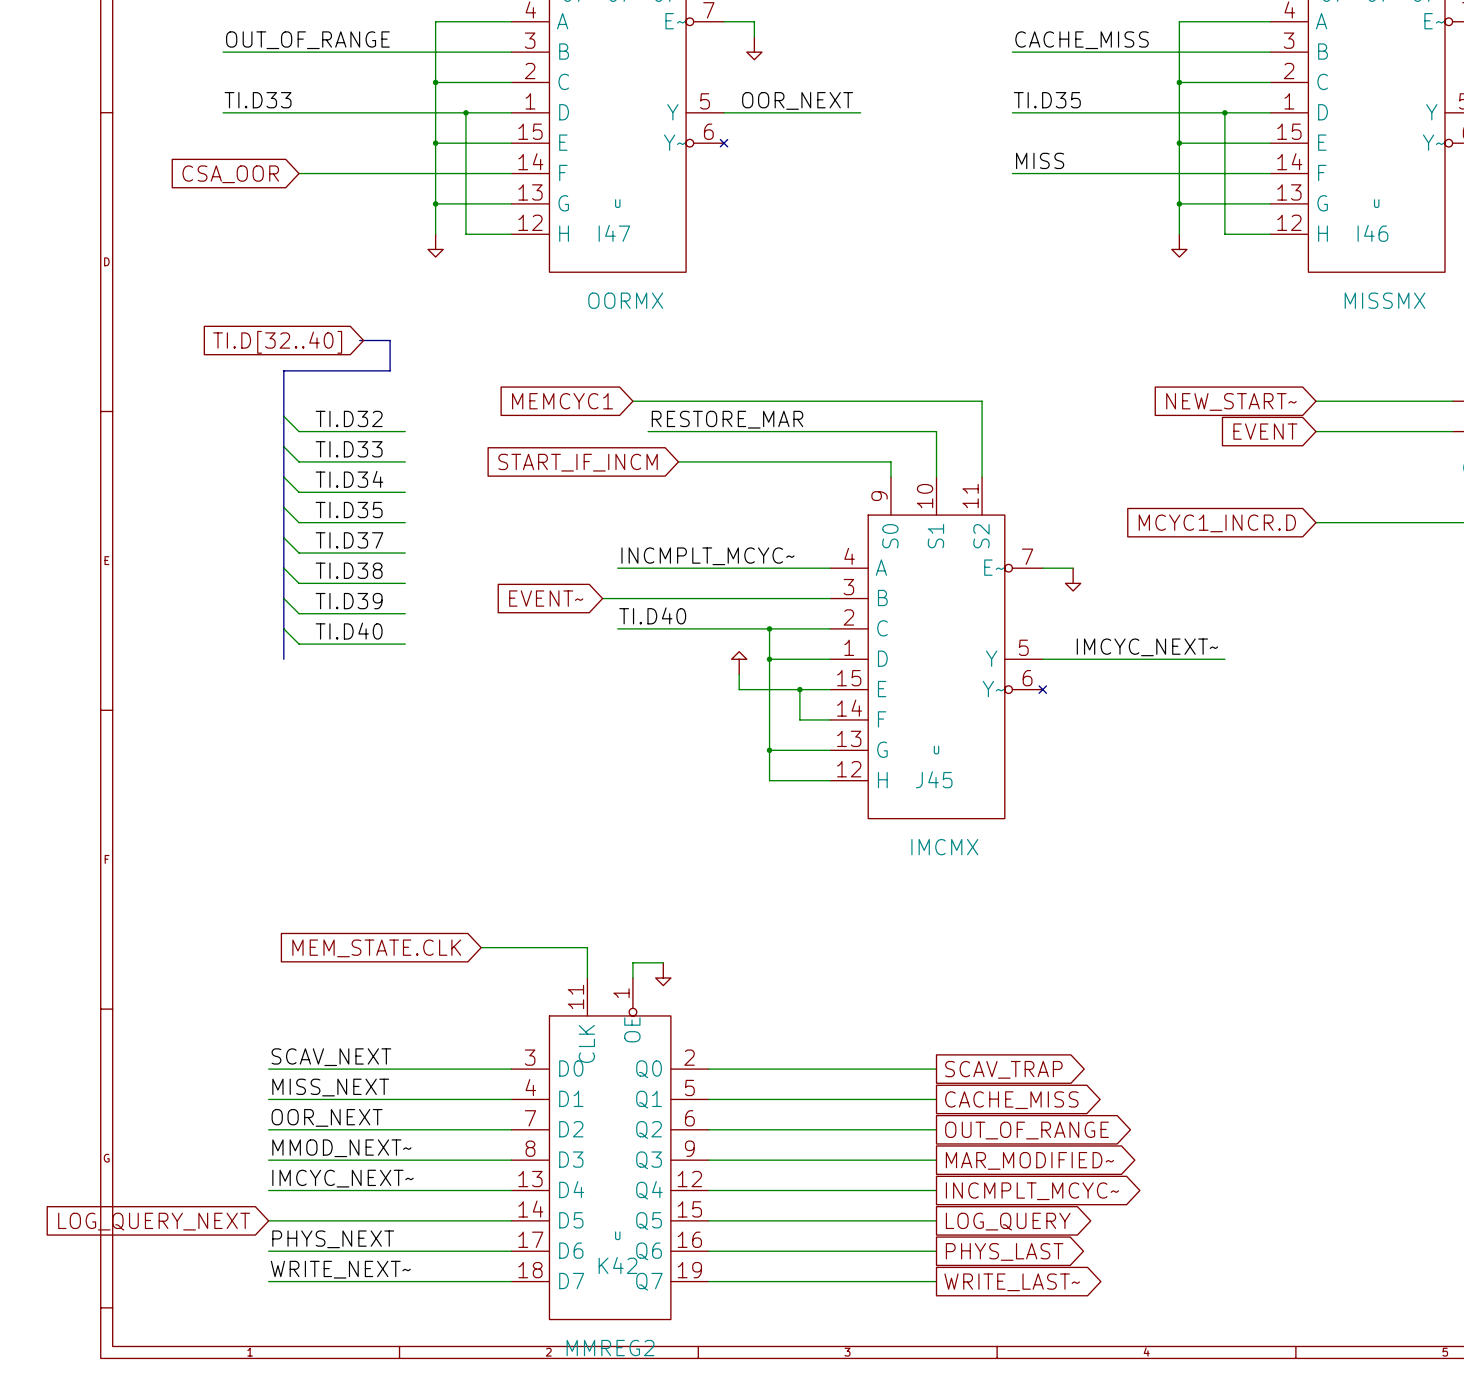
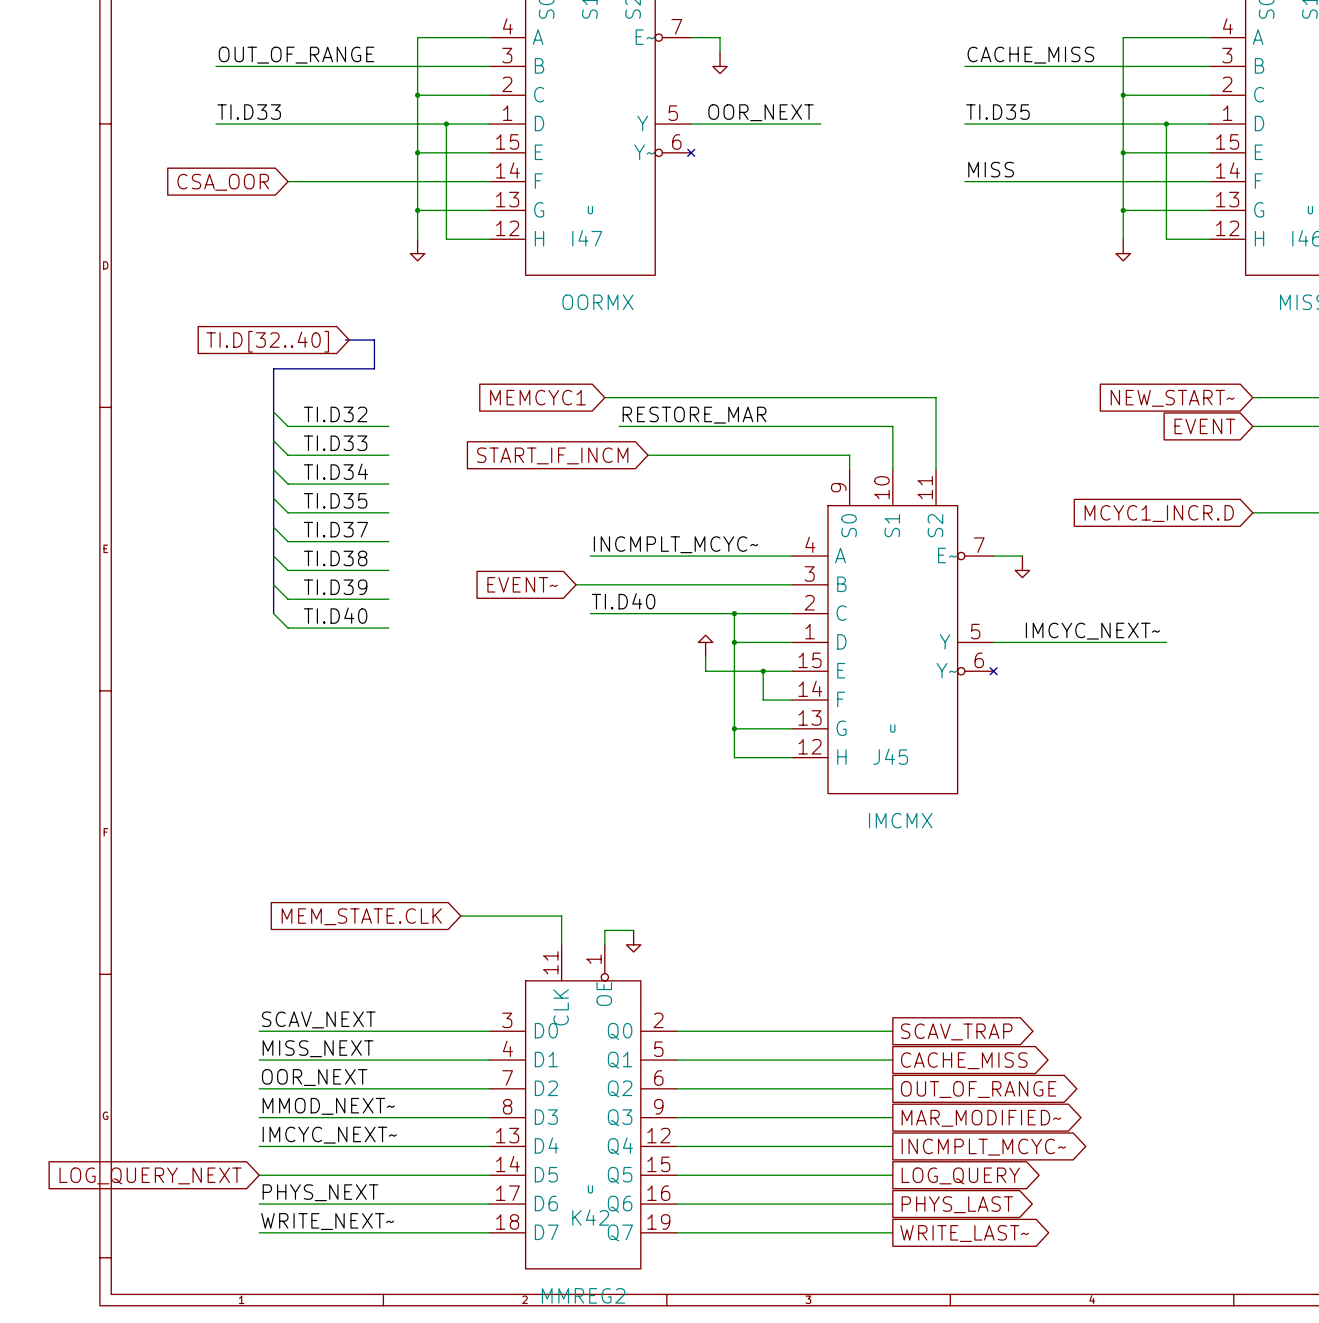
bus: (283, 628) (283, 659) -> none

